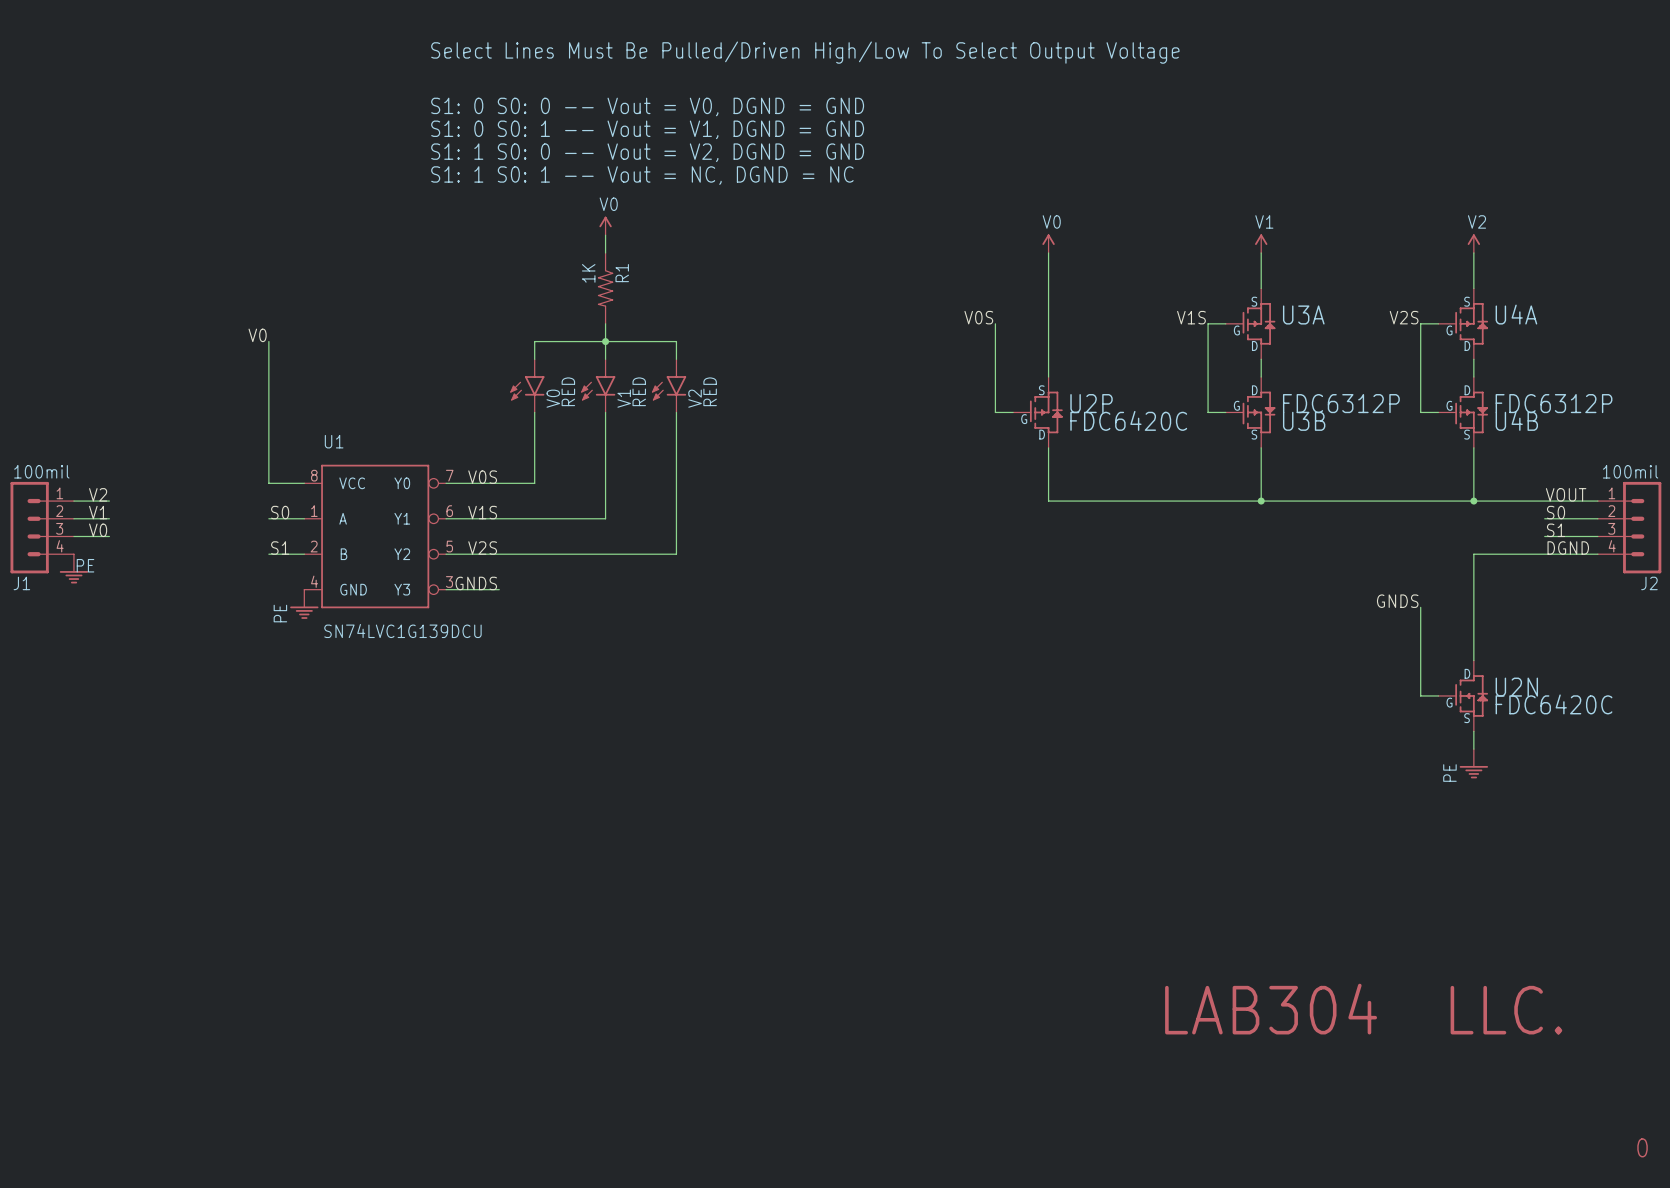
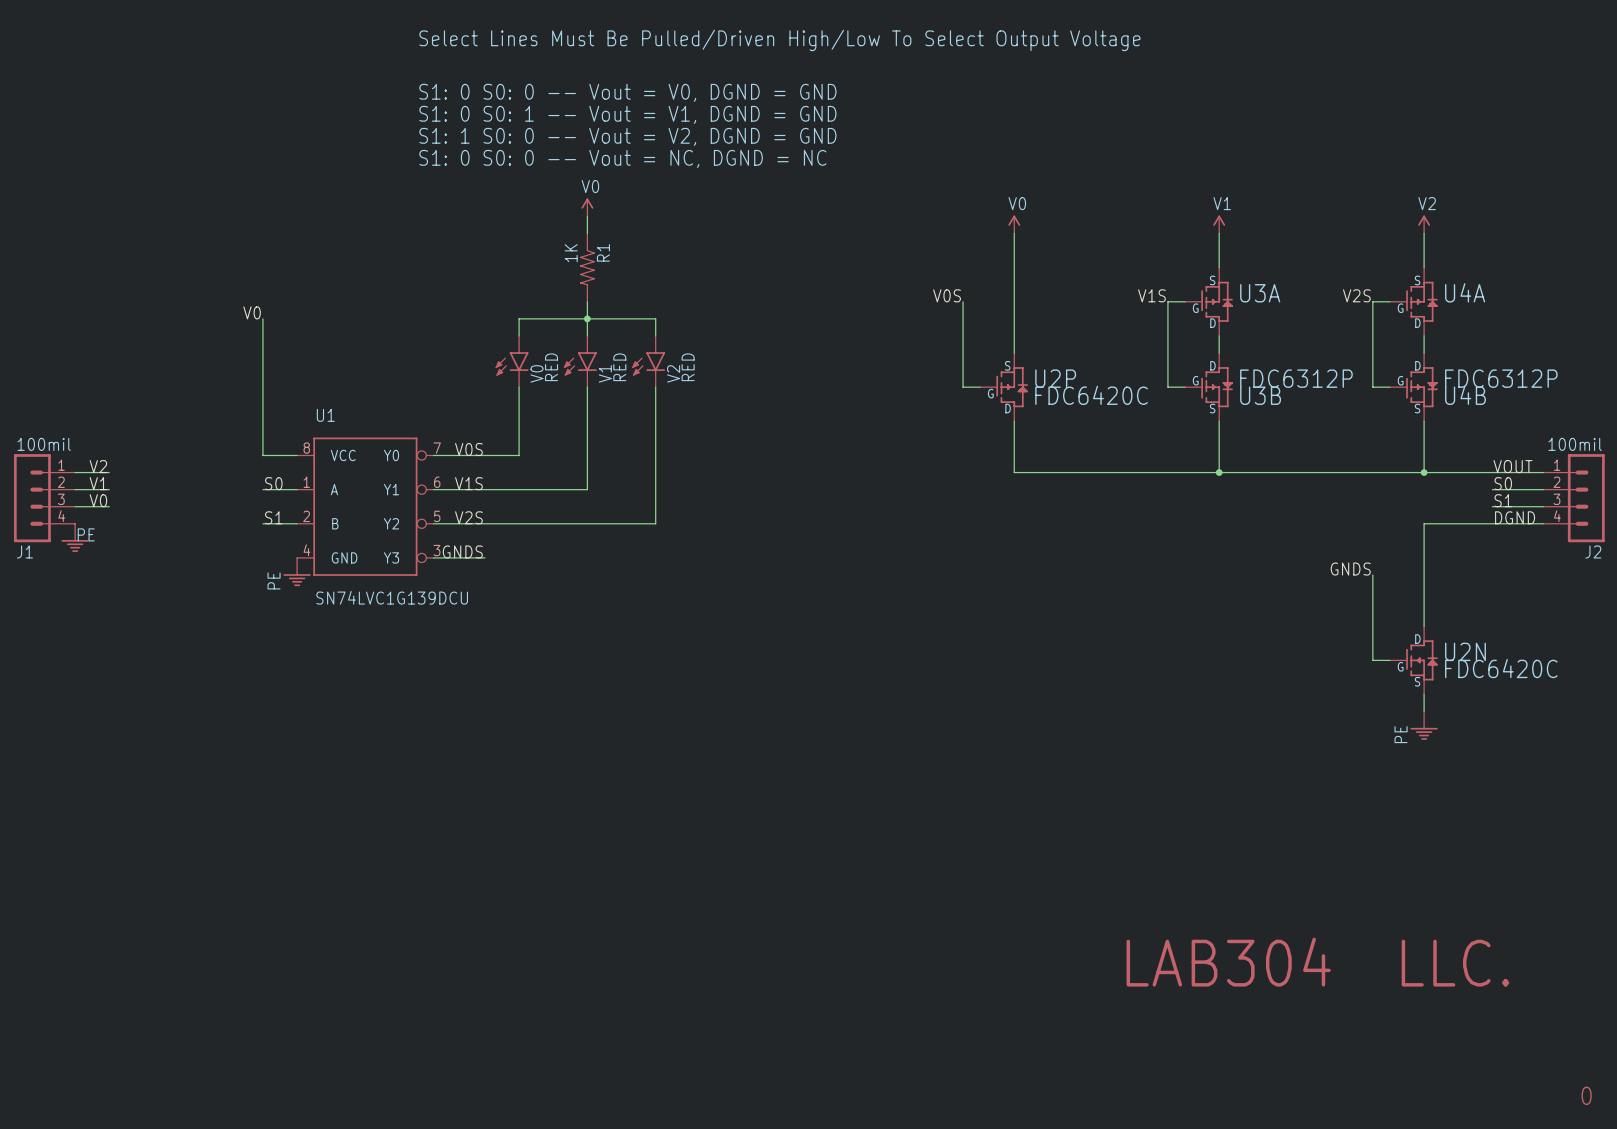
text: S1: 1 S0: 1 -- Vout = NC, DGND = NC (642, 175) -> S1: 0 S0: 0 -- Vout = NC, DGND = NC (622, 158)

